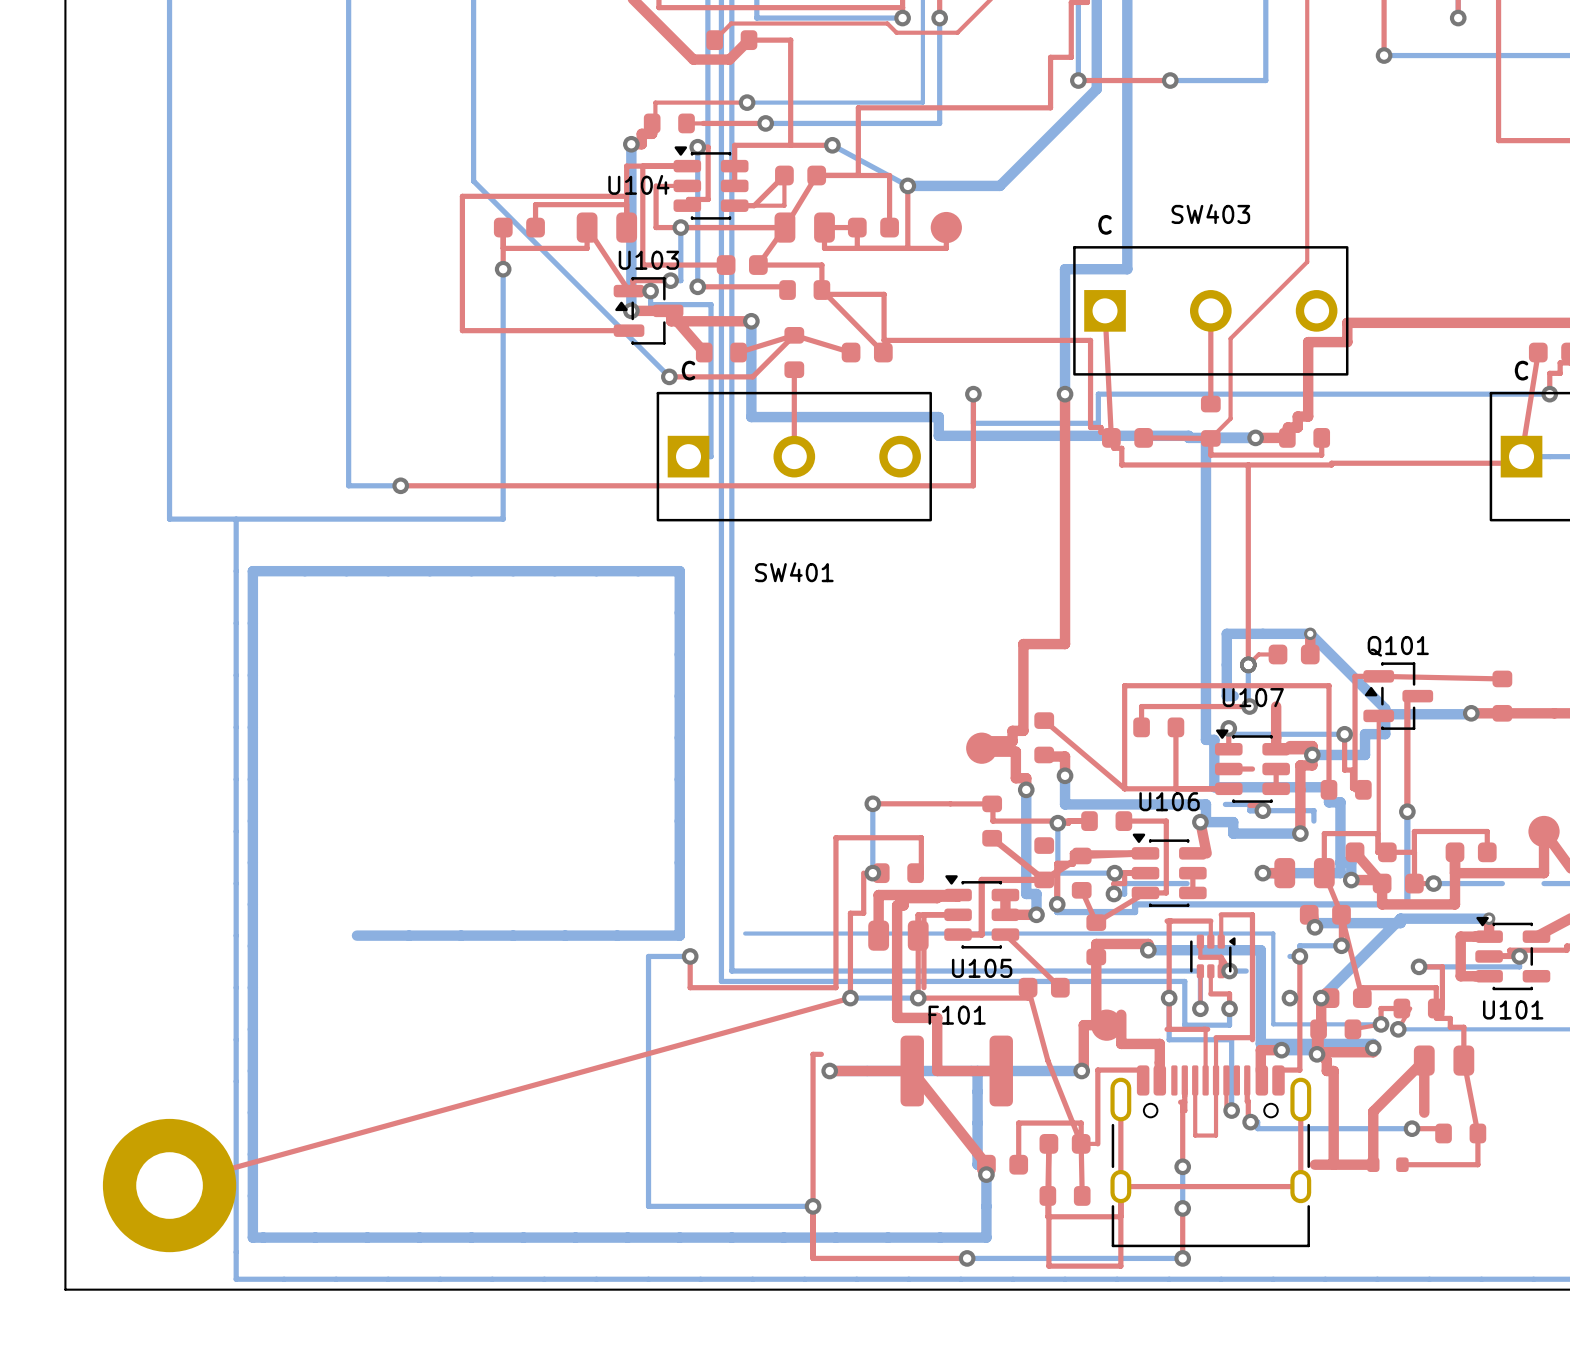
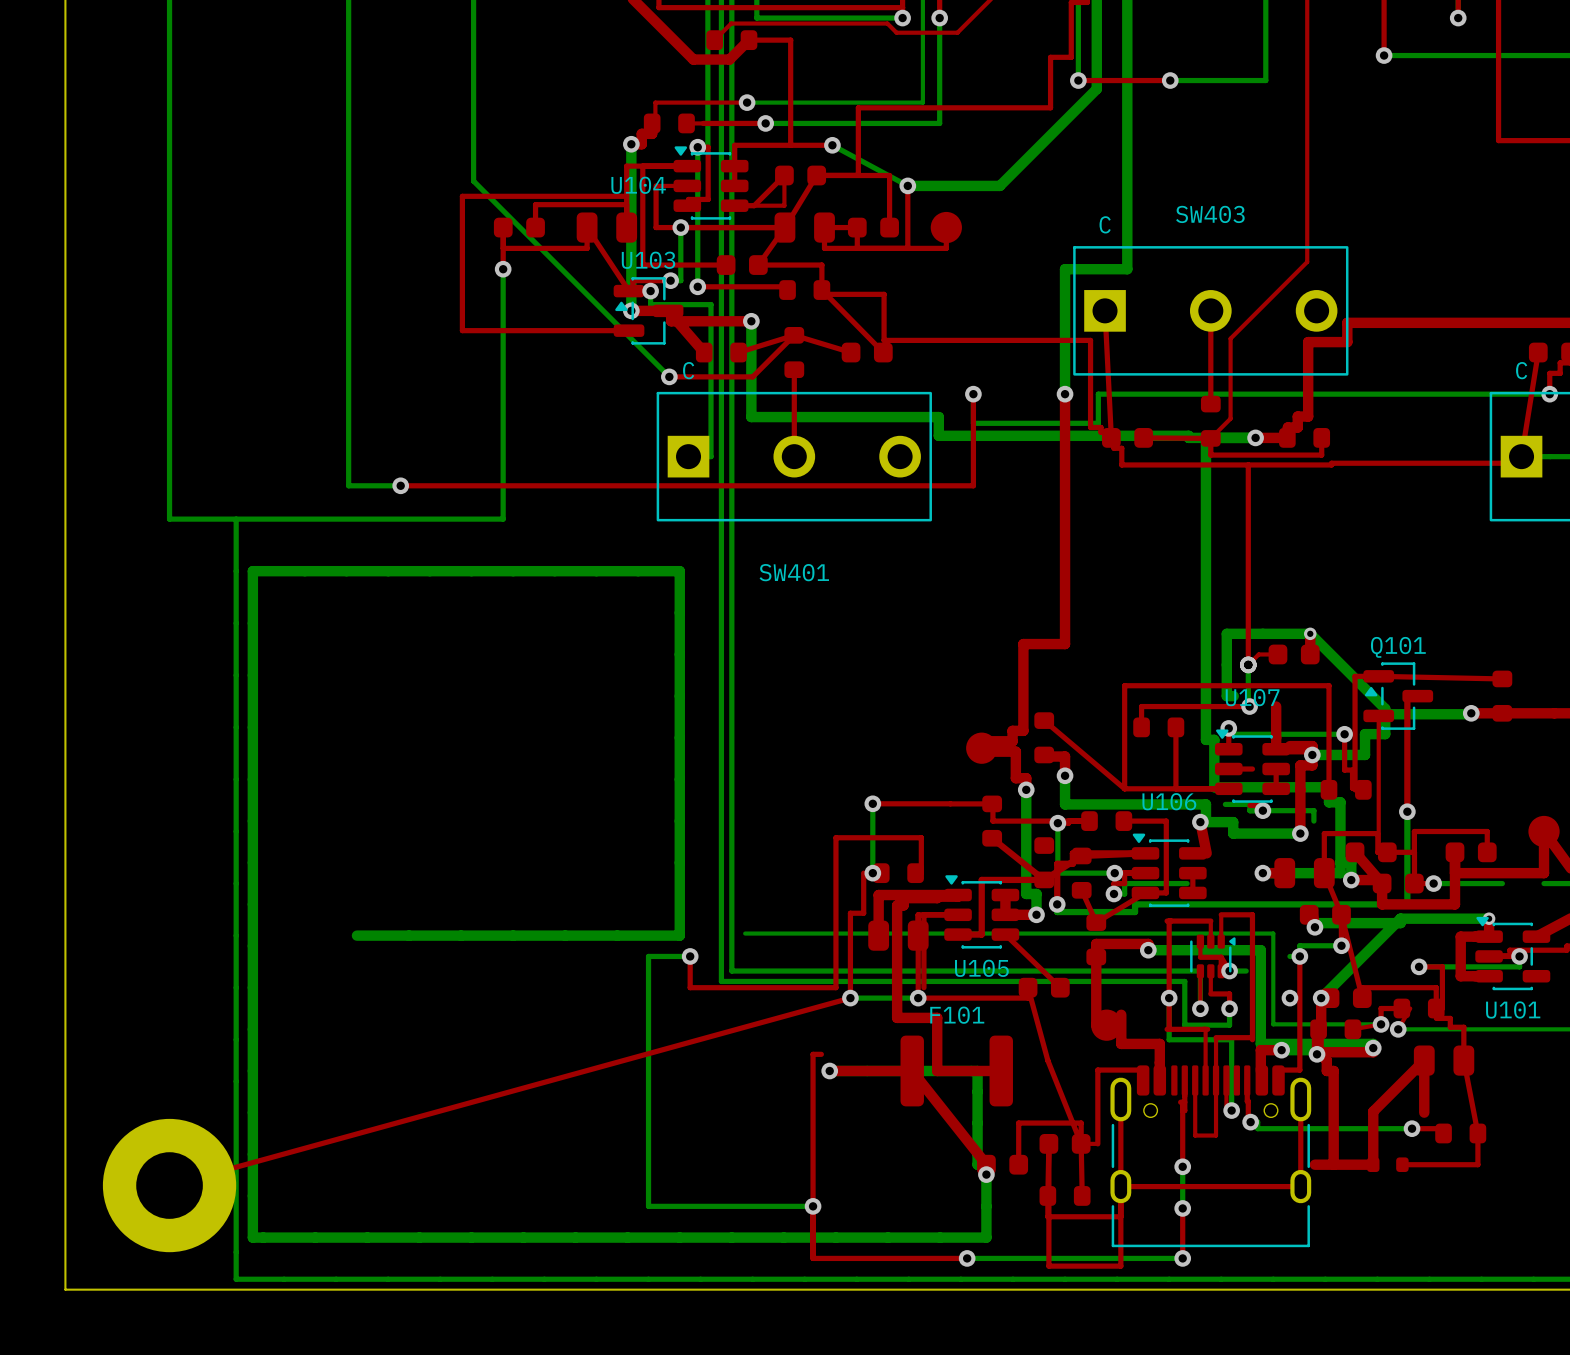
top track: (1096, 1025) (1083, 1025) (1083, 1070) (1081, 1070) -> none
bottom track: (977, 1070) (1081, 1070) -> none
via: (1081, 1070) -> none

